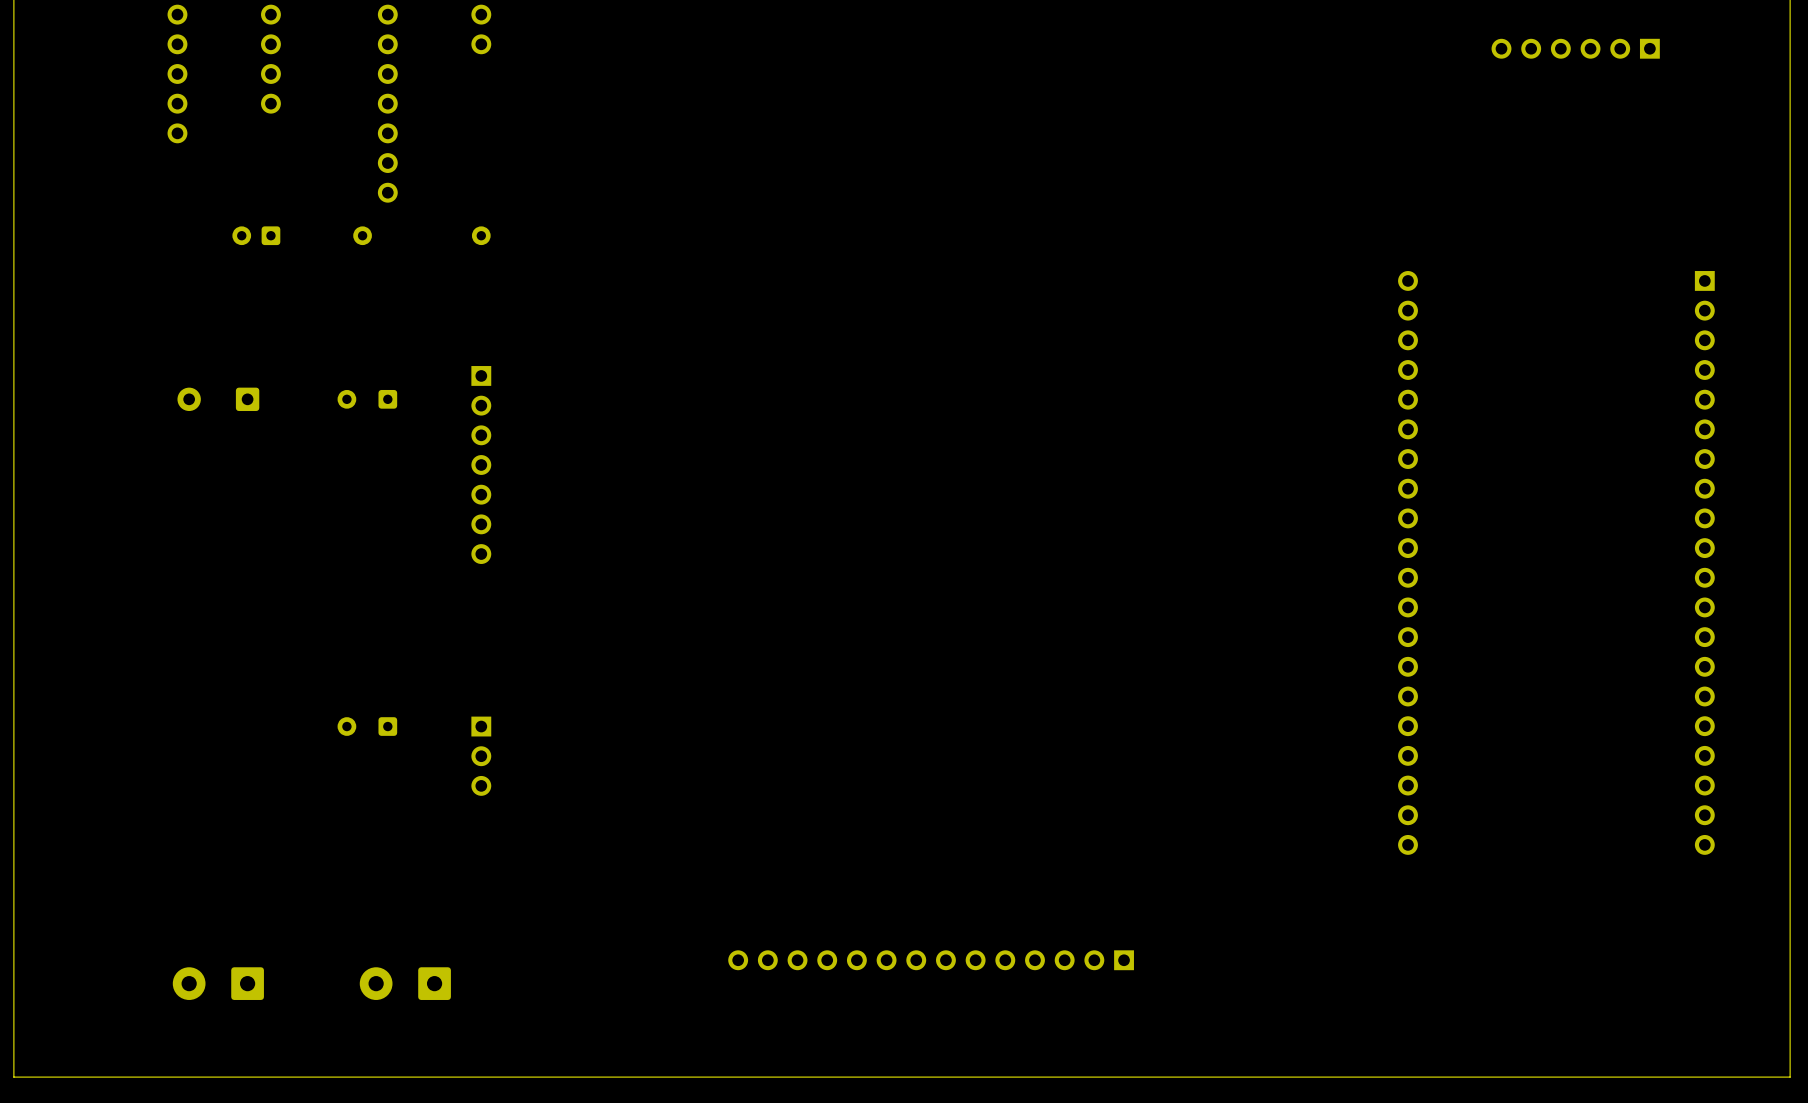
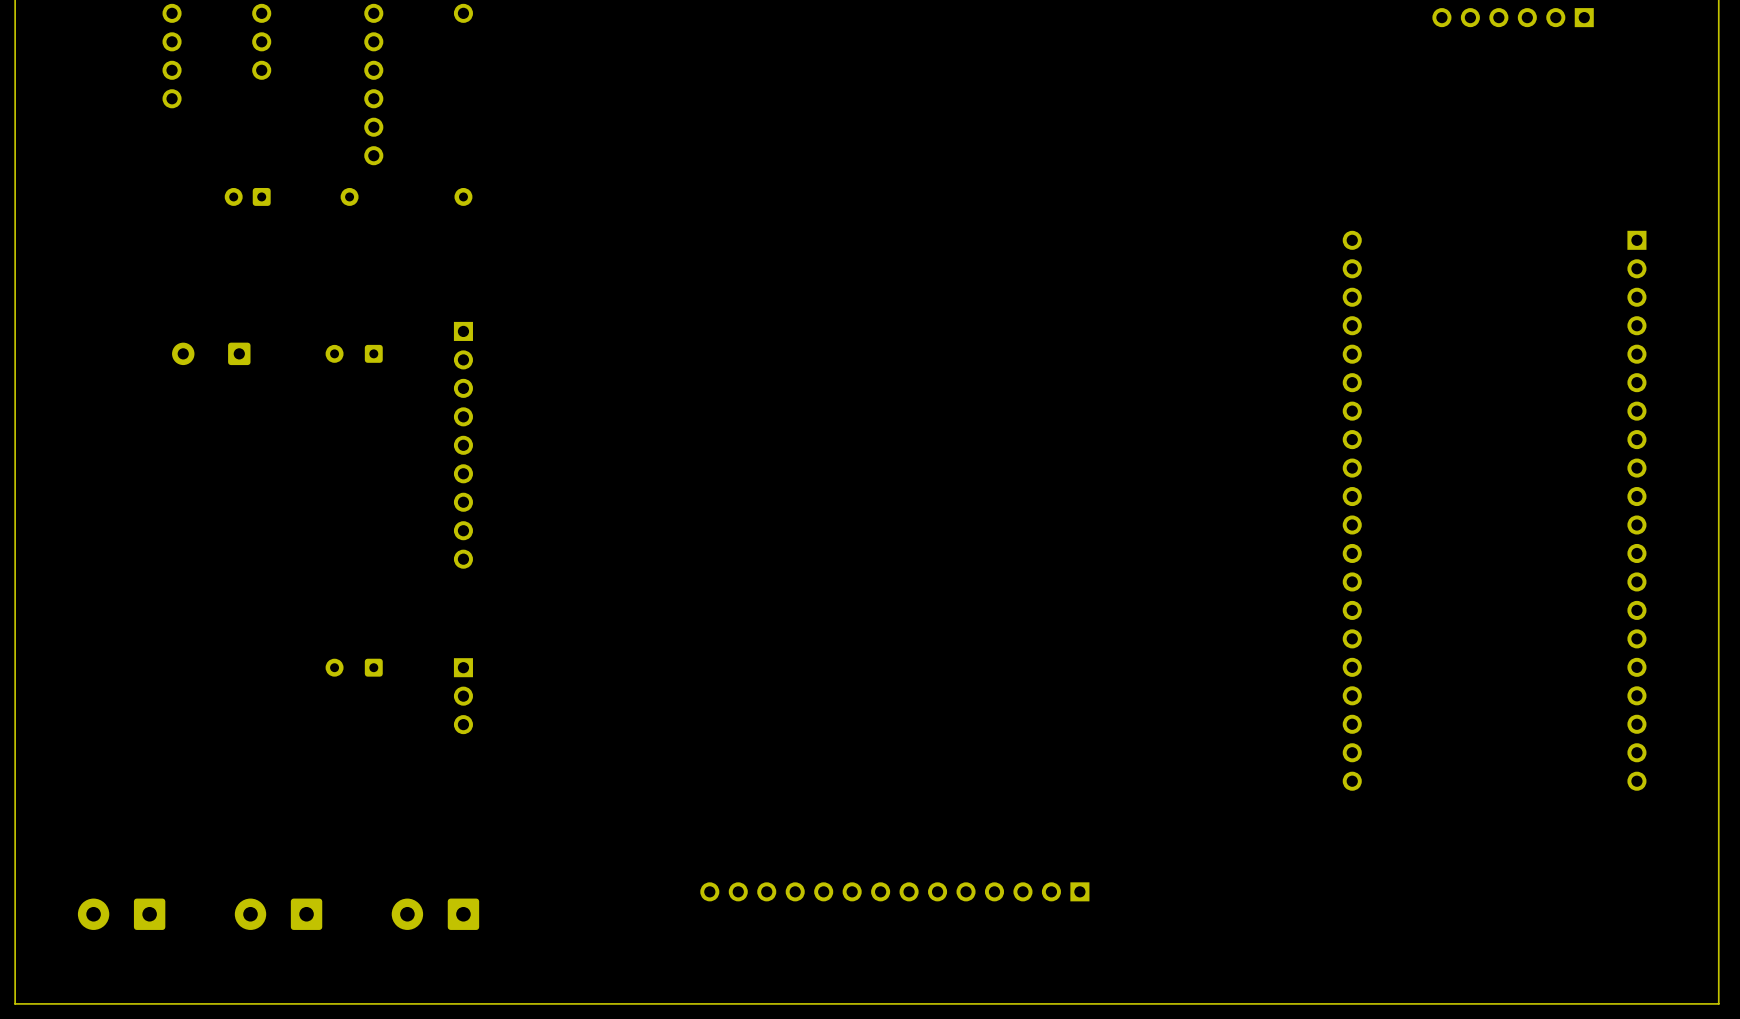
part: none -> (463, 445)
part: none -> (121, 914)
part: (218, 983) -> none
part: none -> (278, 914)
part position: (405, 983) -> (435, 914)

